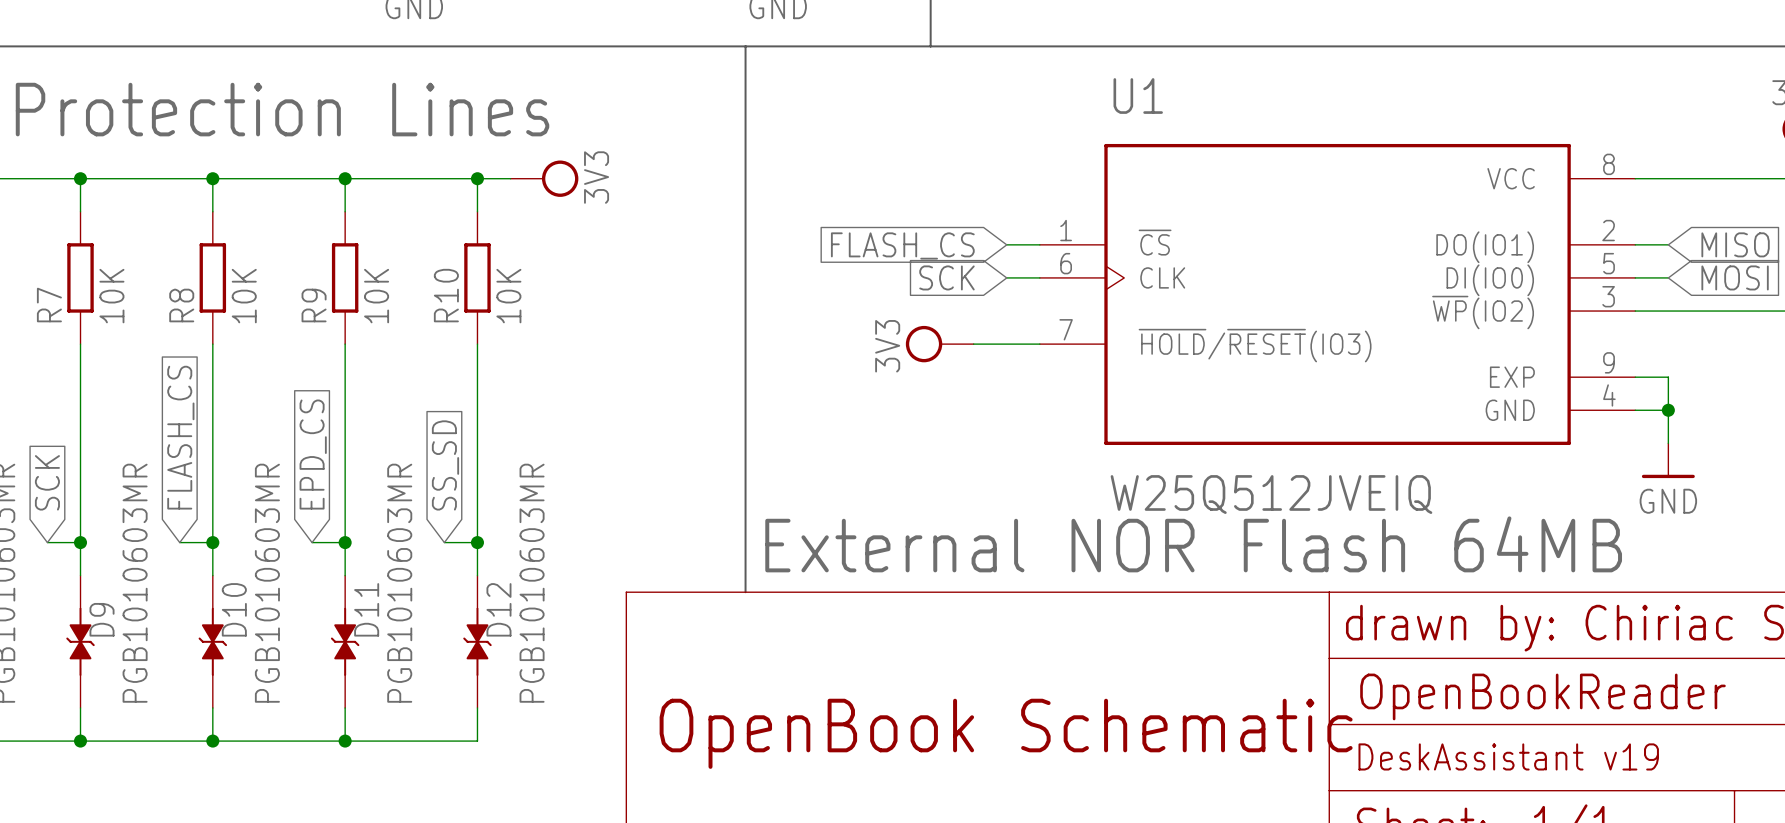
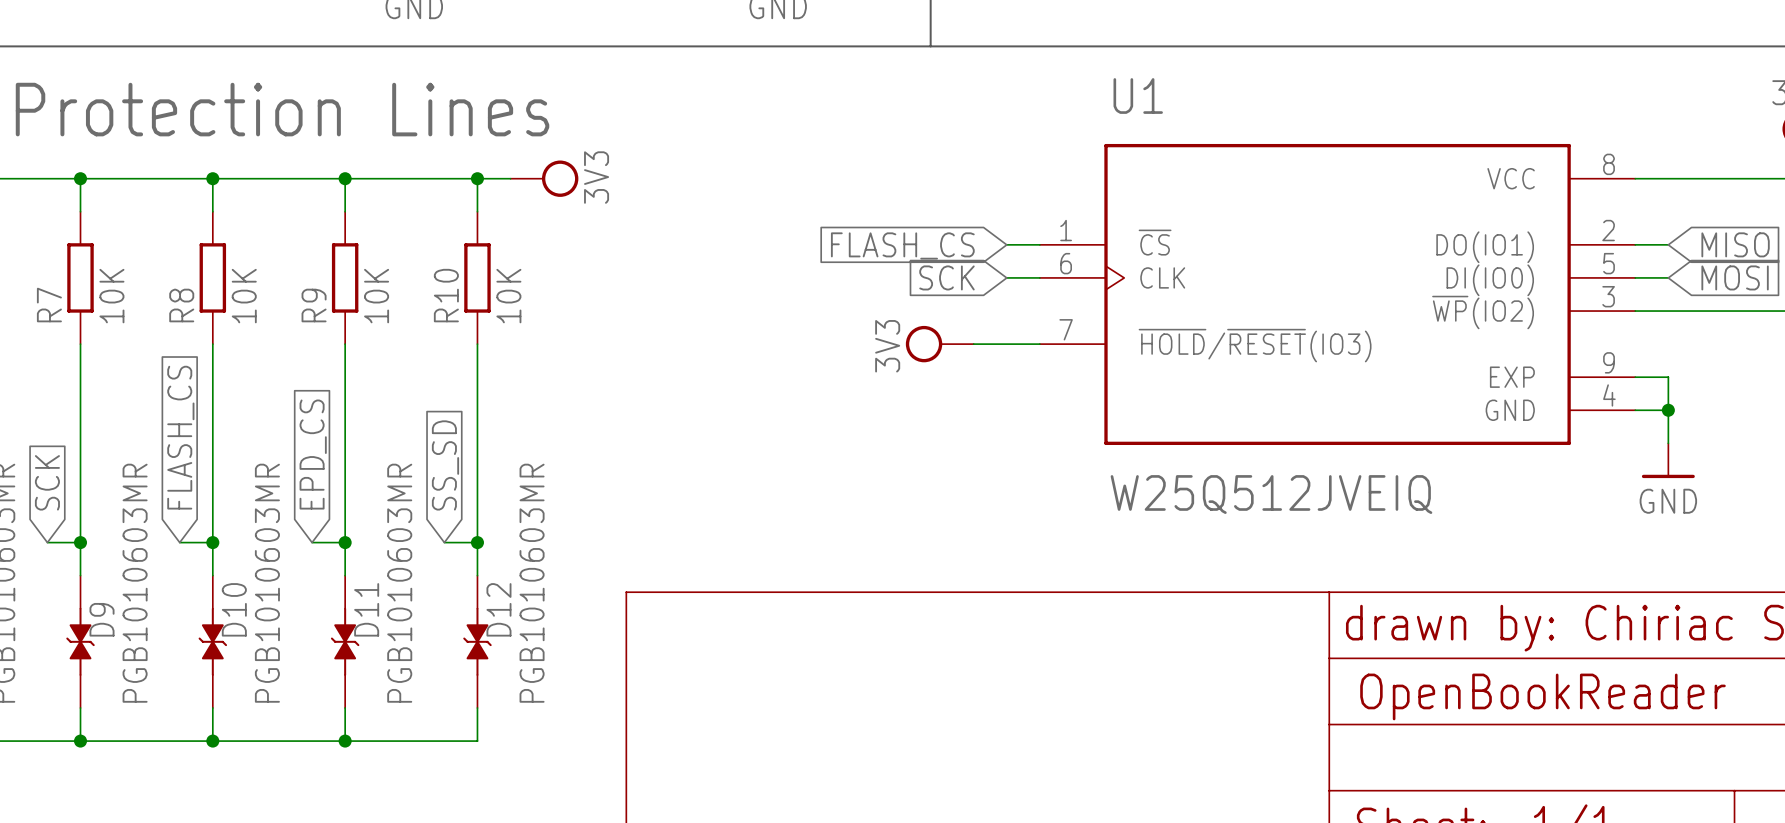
line: (745, 46) (745, 592) -> none
text: External NOR Flash 64MB (1193, 544) -> none
text: OpenBook Schematic (1006, 733) -> none
text: DeskAssistant v19 (1508, 756) -> none

